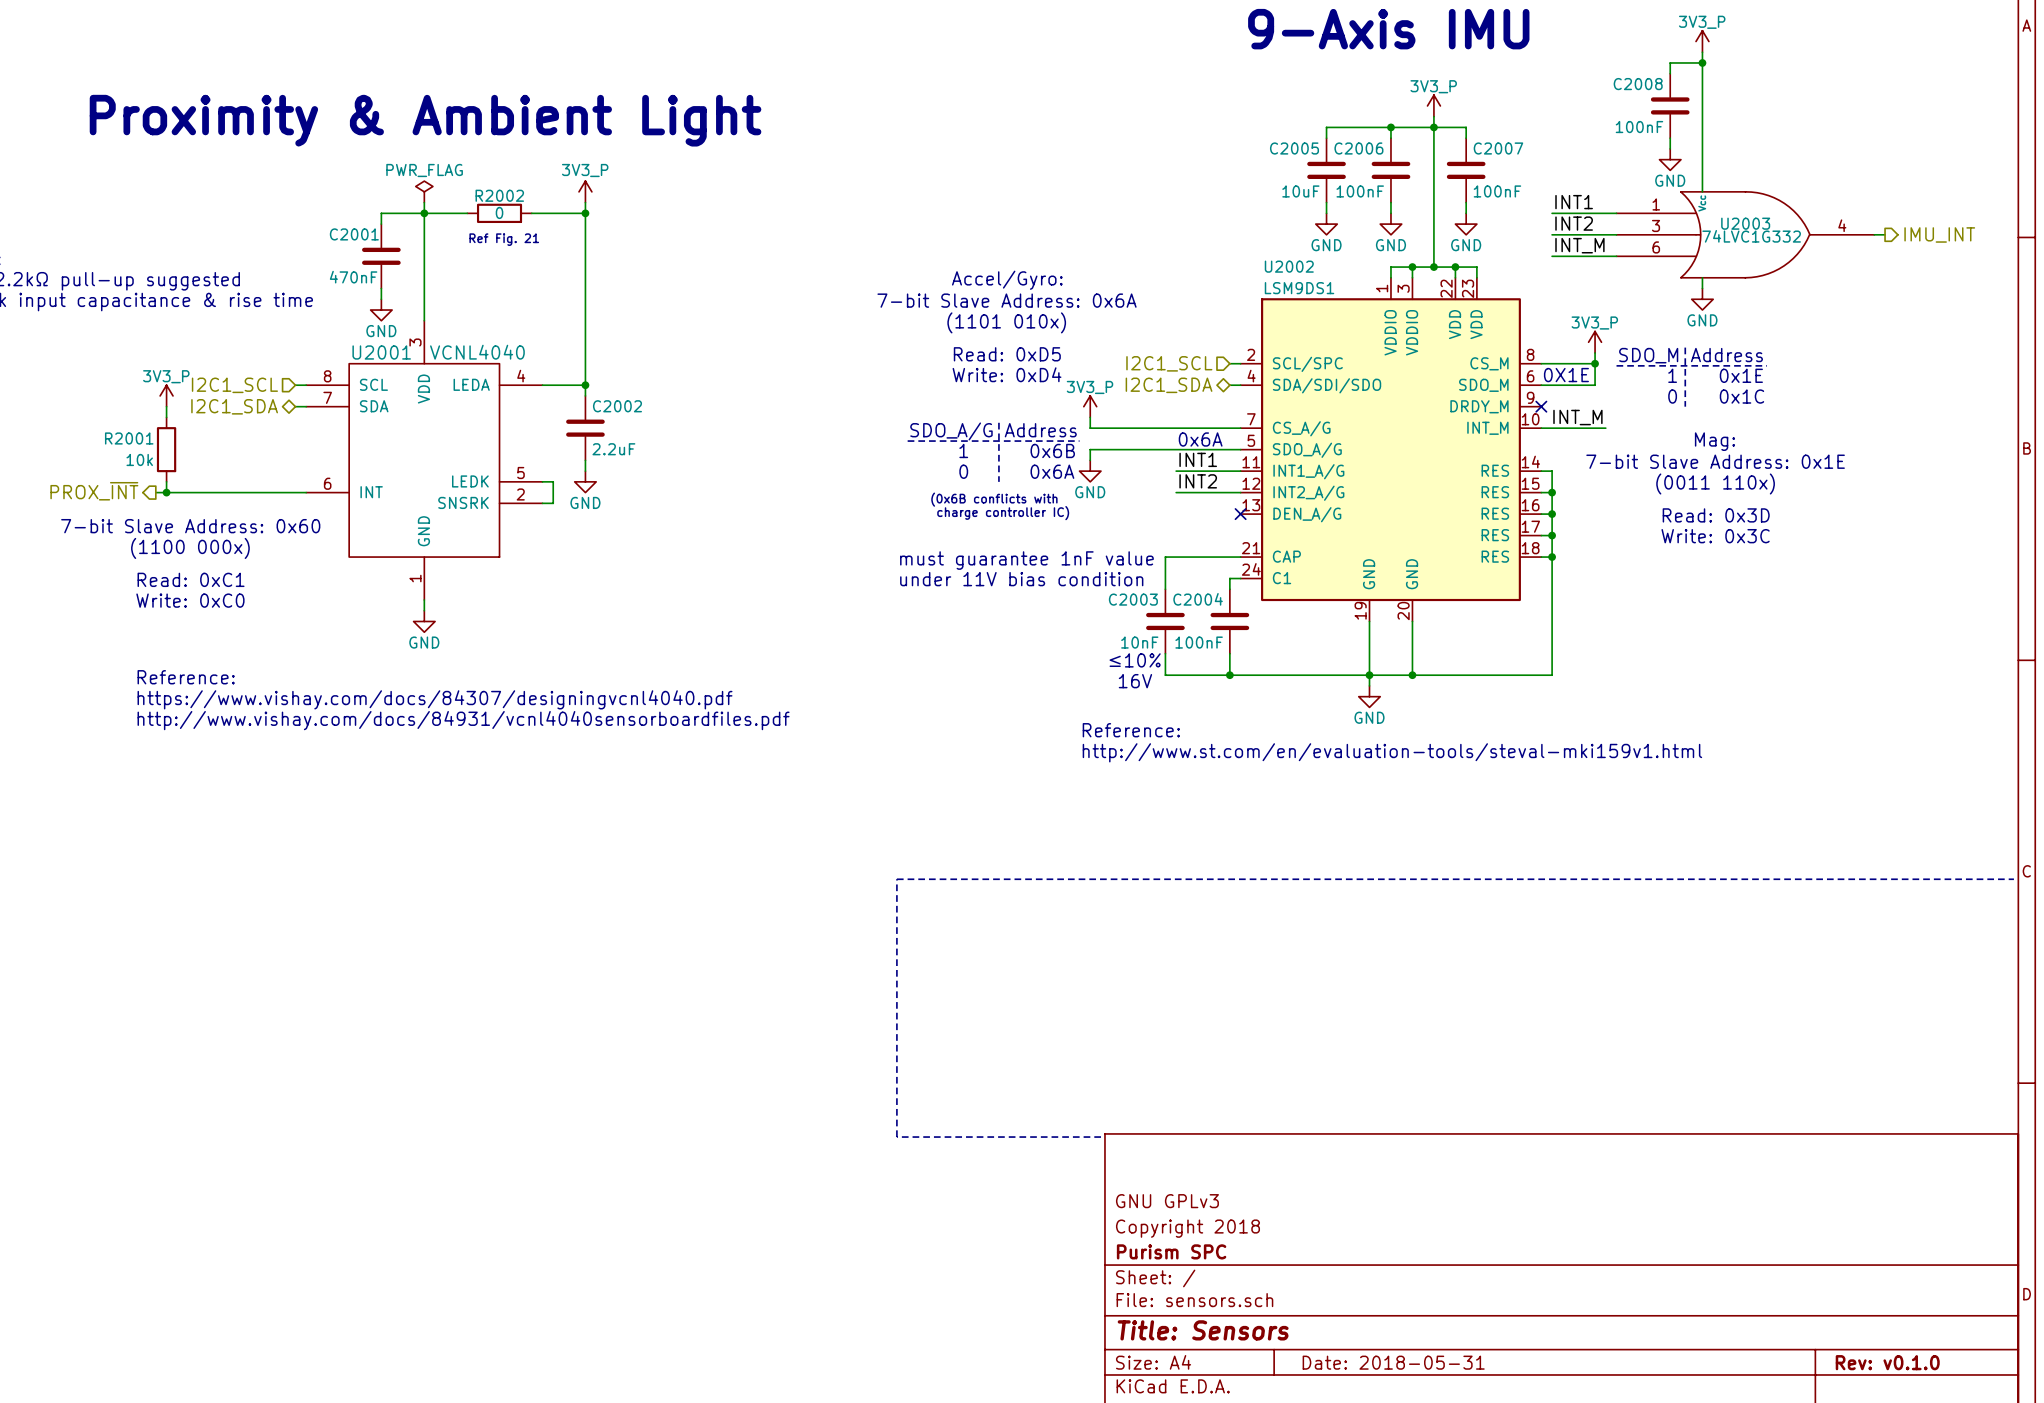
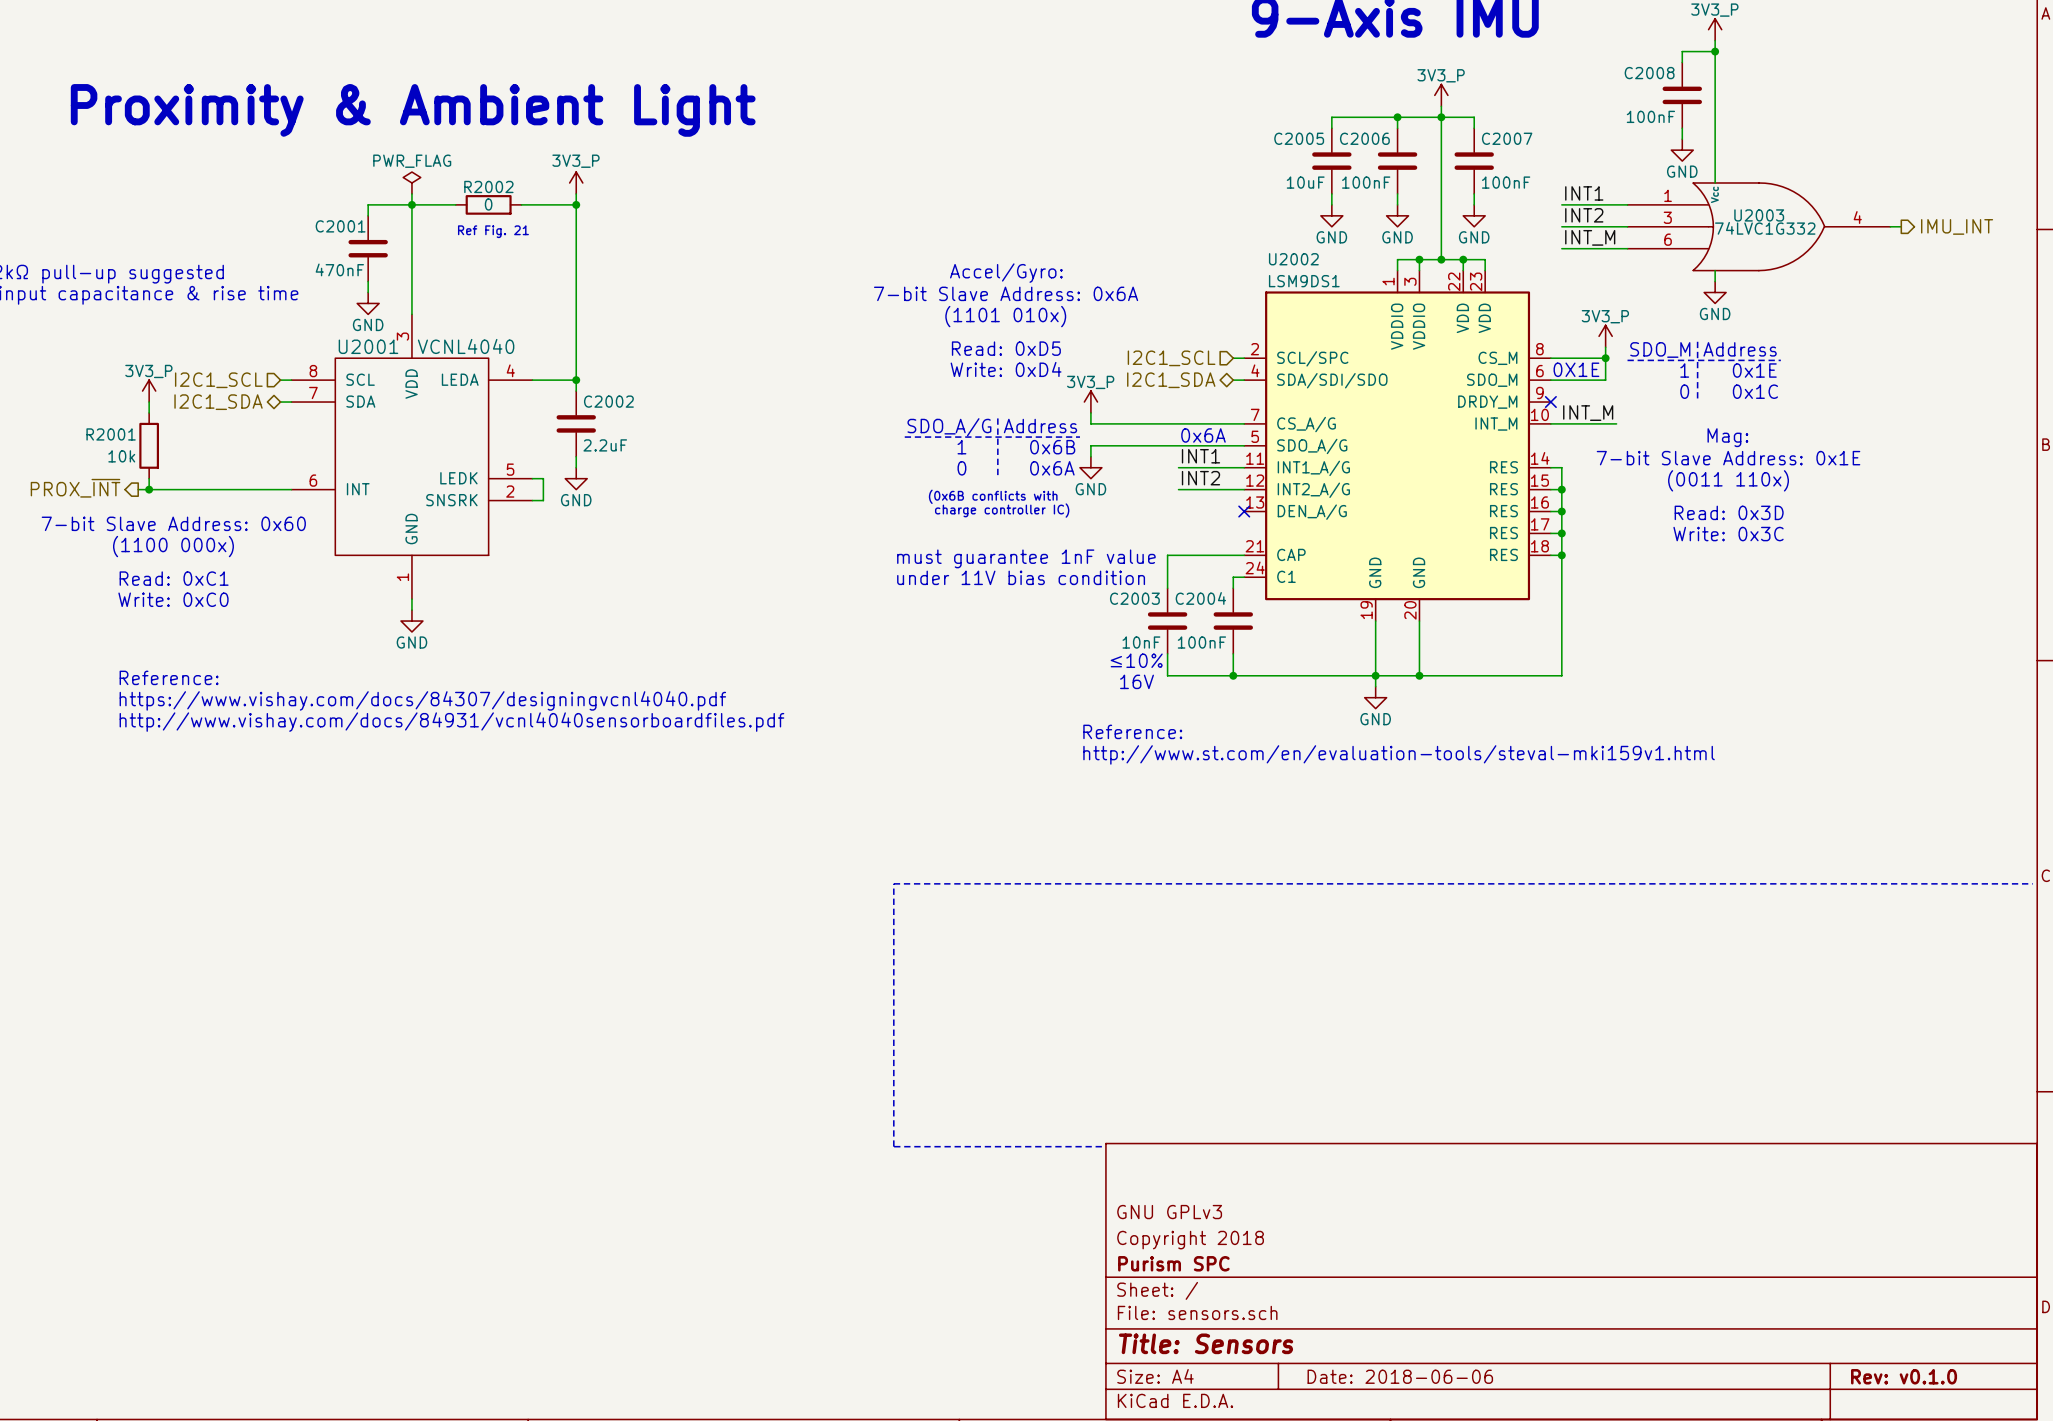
title block: Date: 2018-05-31 (1393, 1362) -> Date: 2018-06-06 (1400, 1376)

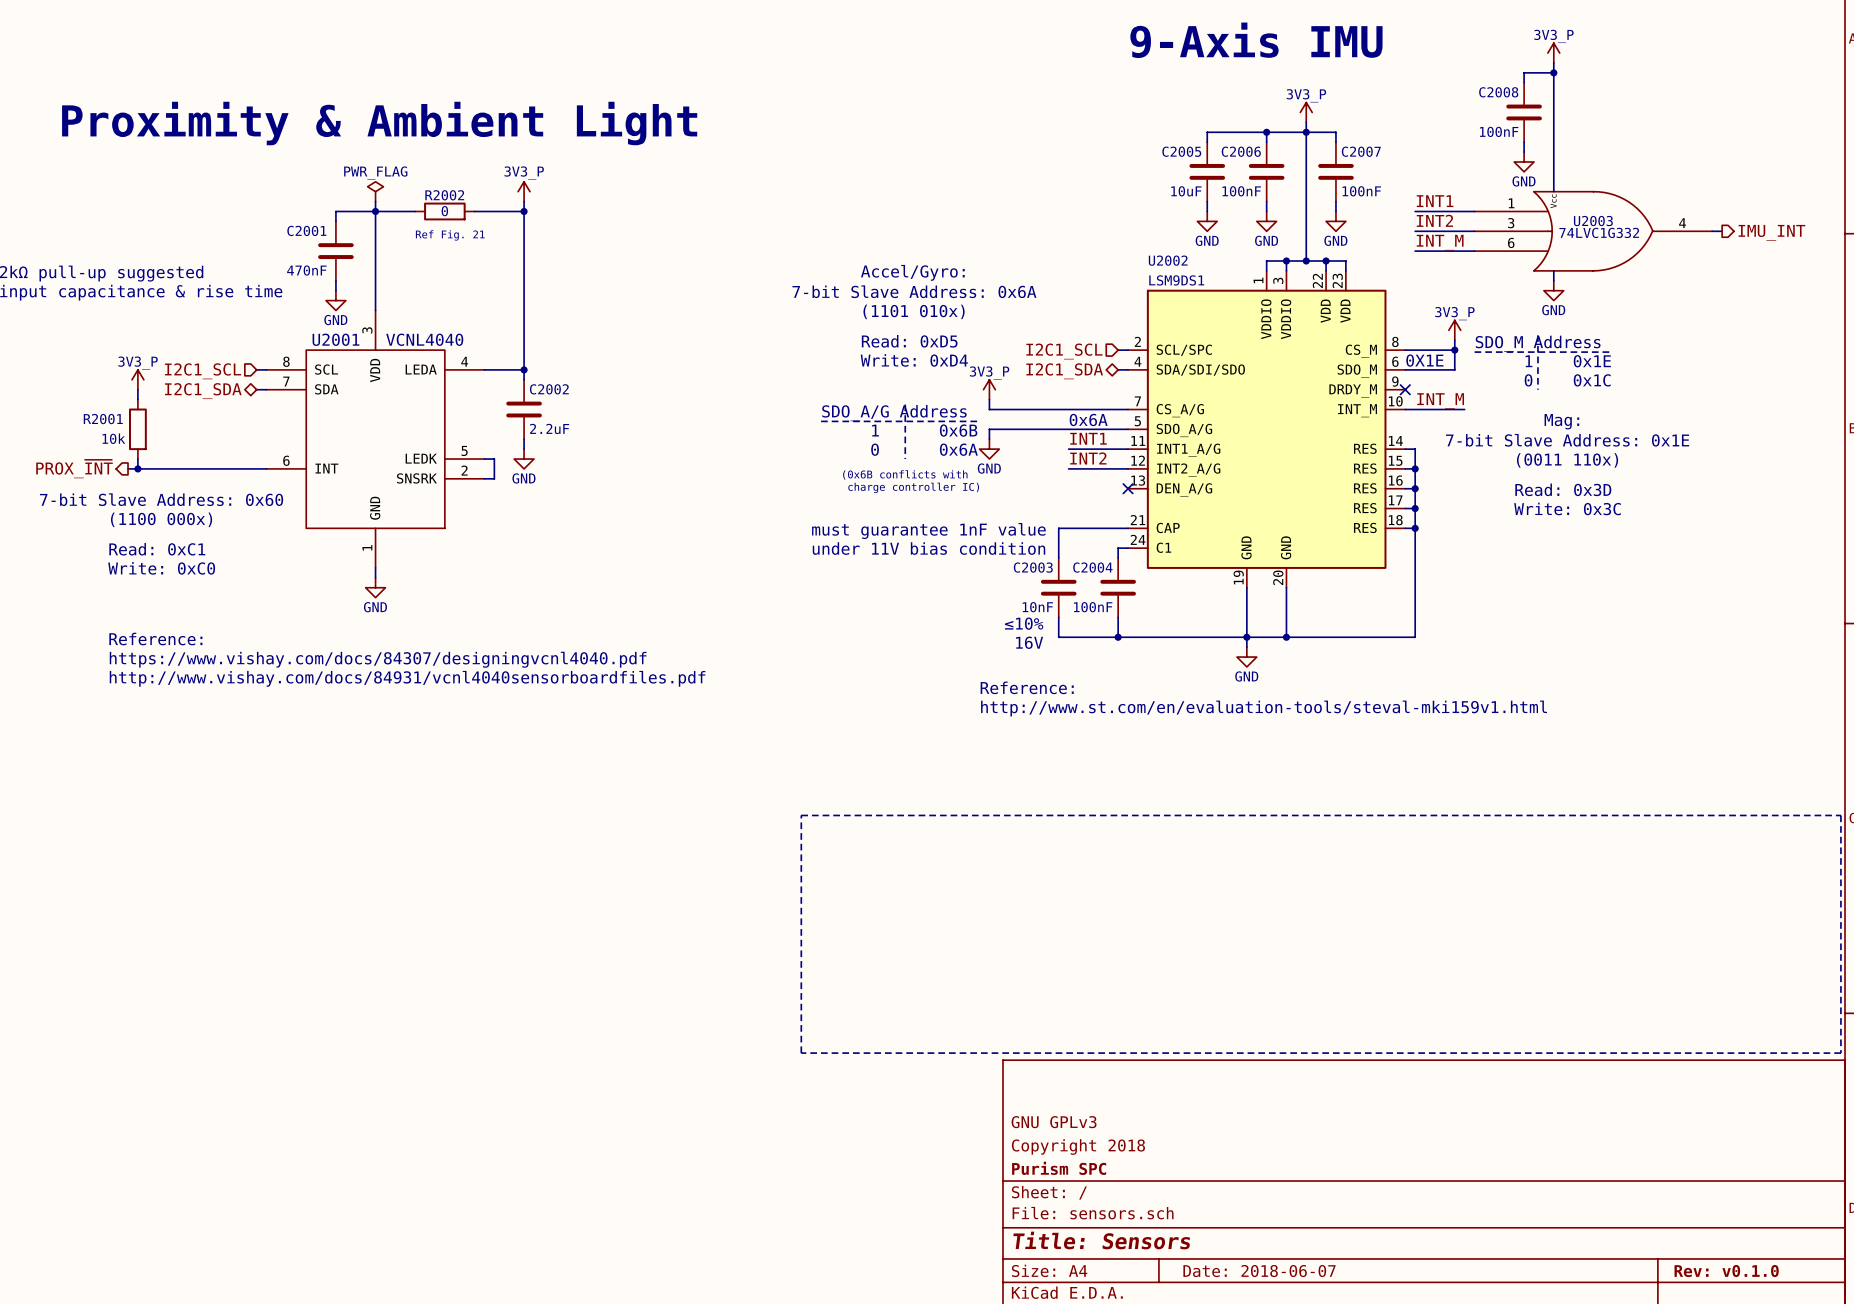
line: none -> (801, 815) (1840, 815) (1840, 1053) (801, 1053) (801, 815)
line: (2032, 883) (893, 883) (893, 1146) (1101, 1146) -> none
title block: Date: 2018-06-06 (1400, 1376) -> Date: 2018-06-07 (1259, 1271)

